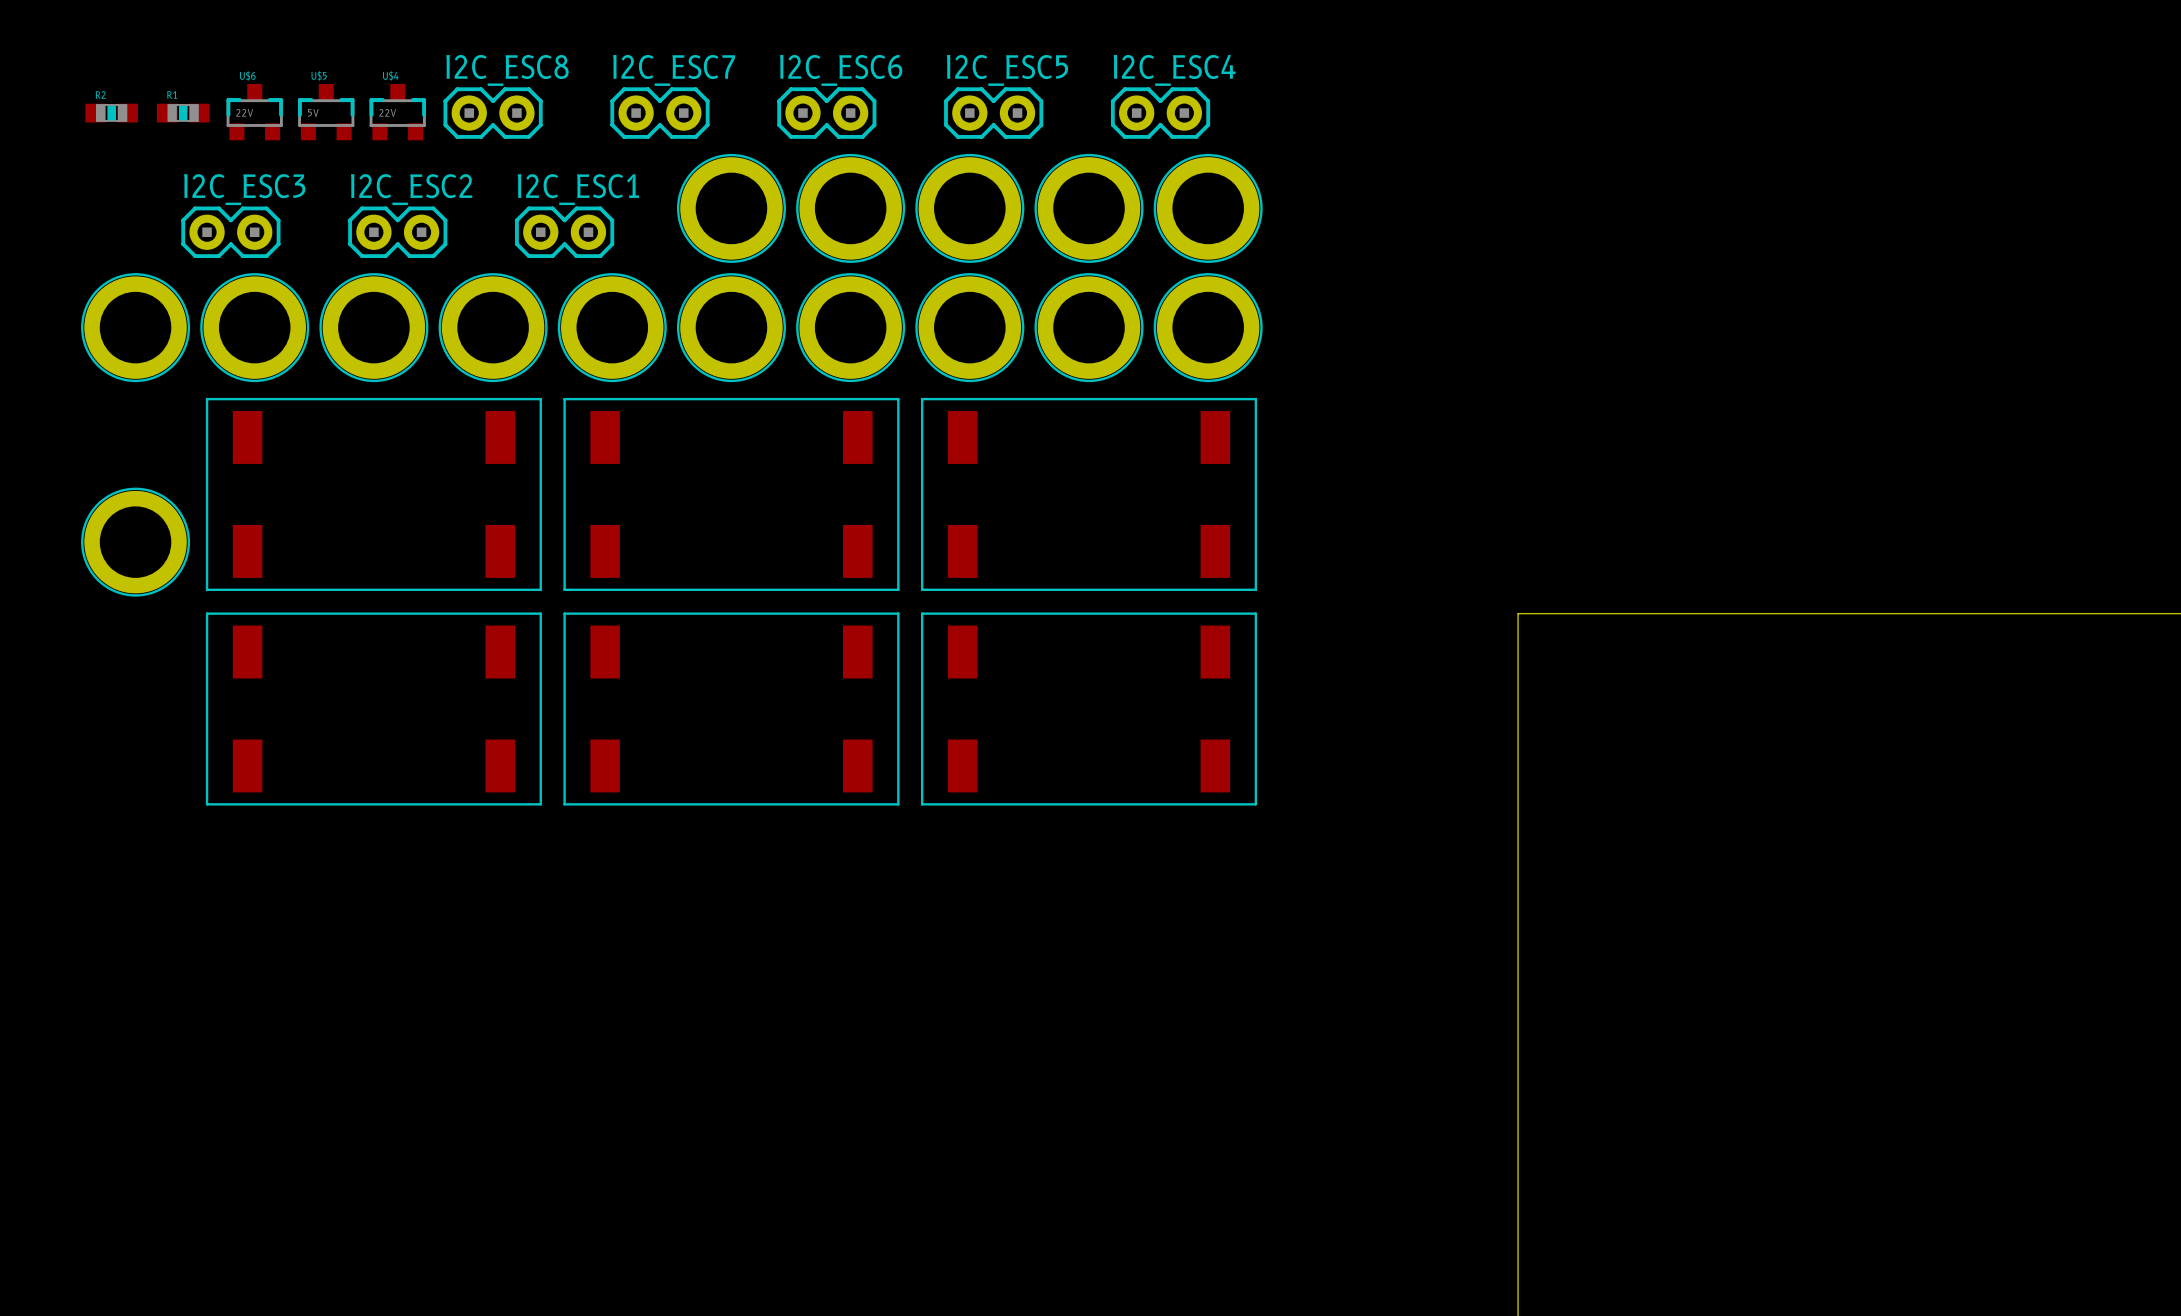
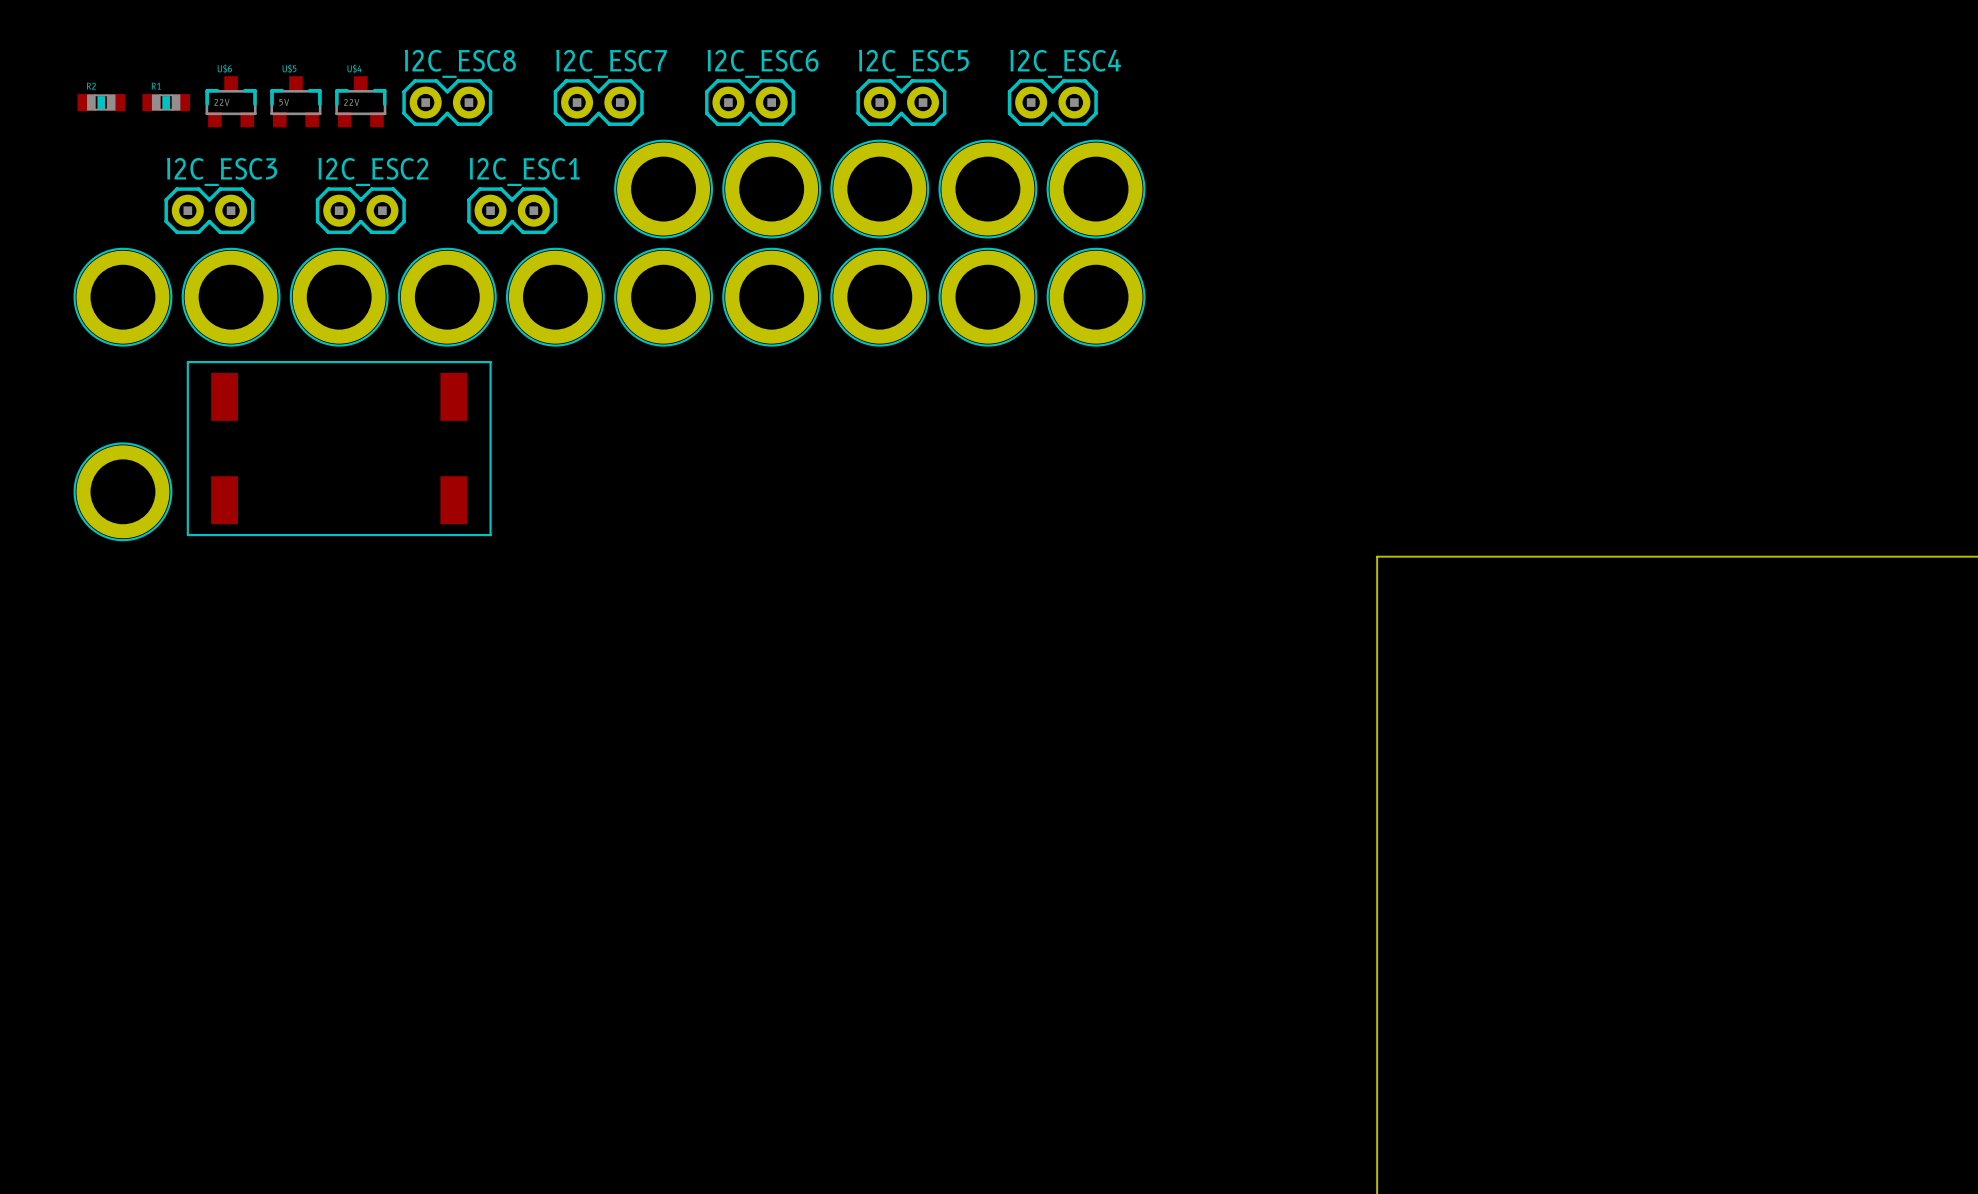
part: (731, 494) -> none
part: (1089, 494) -> none
part: (373, 708) -> none
part: (731, 708) -> none
part: (1089, 708) -> none

